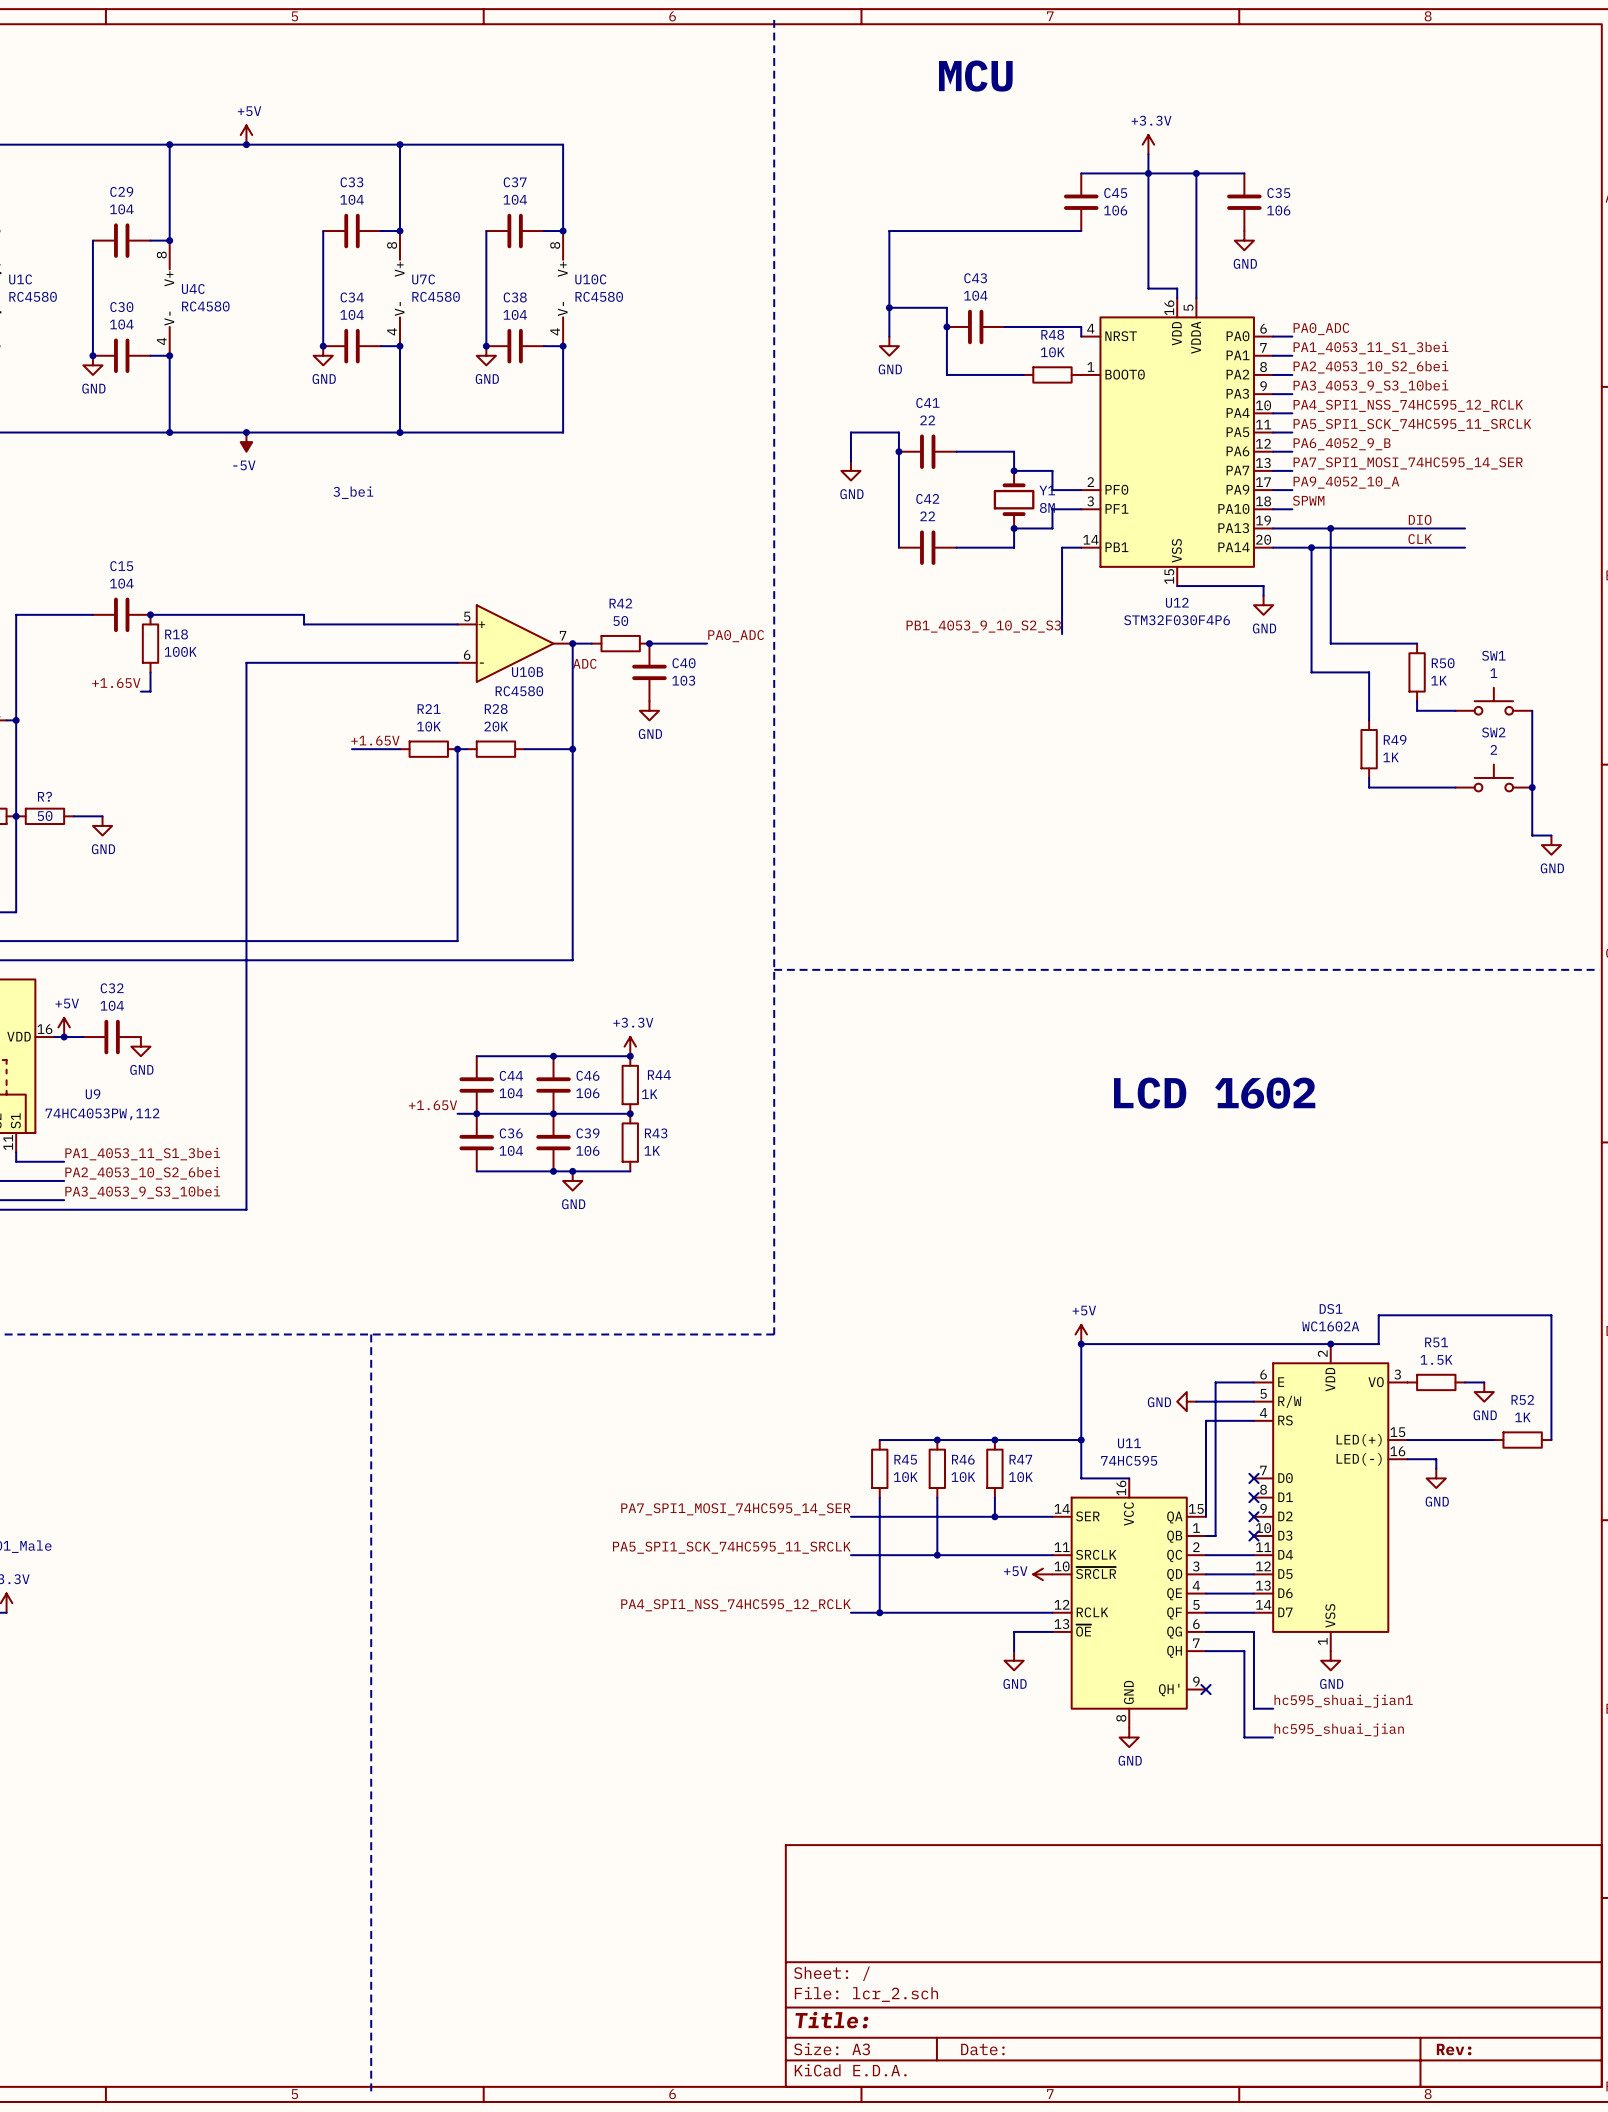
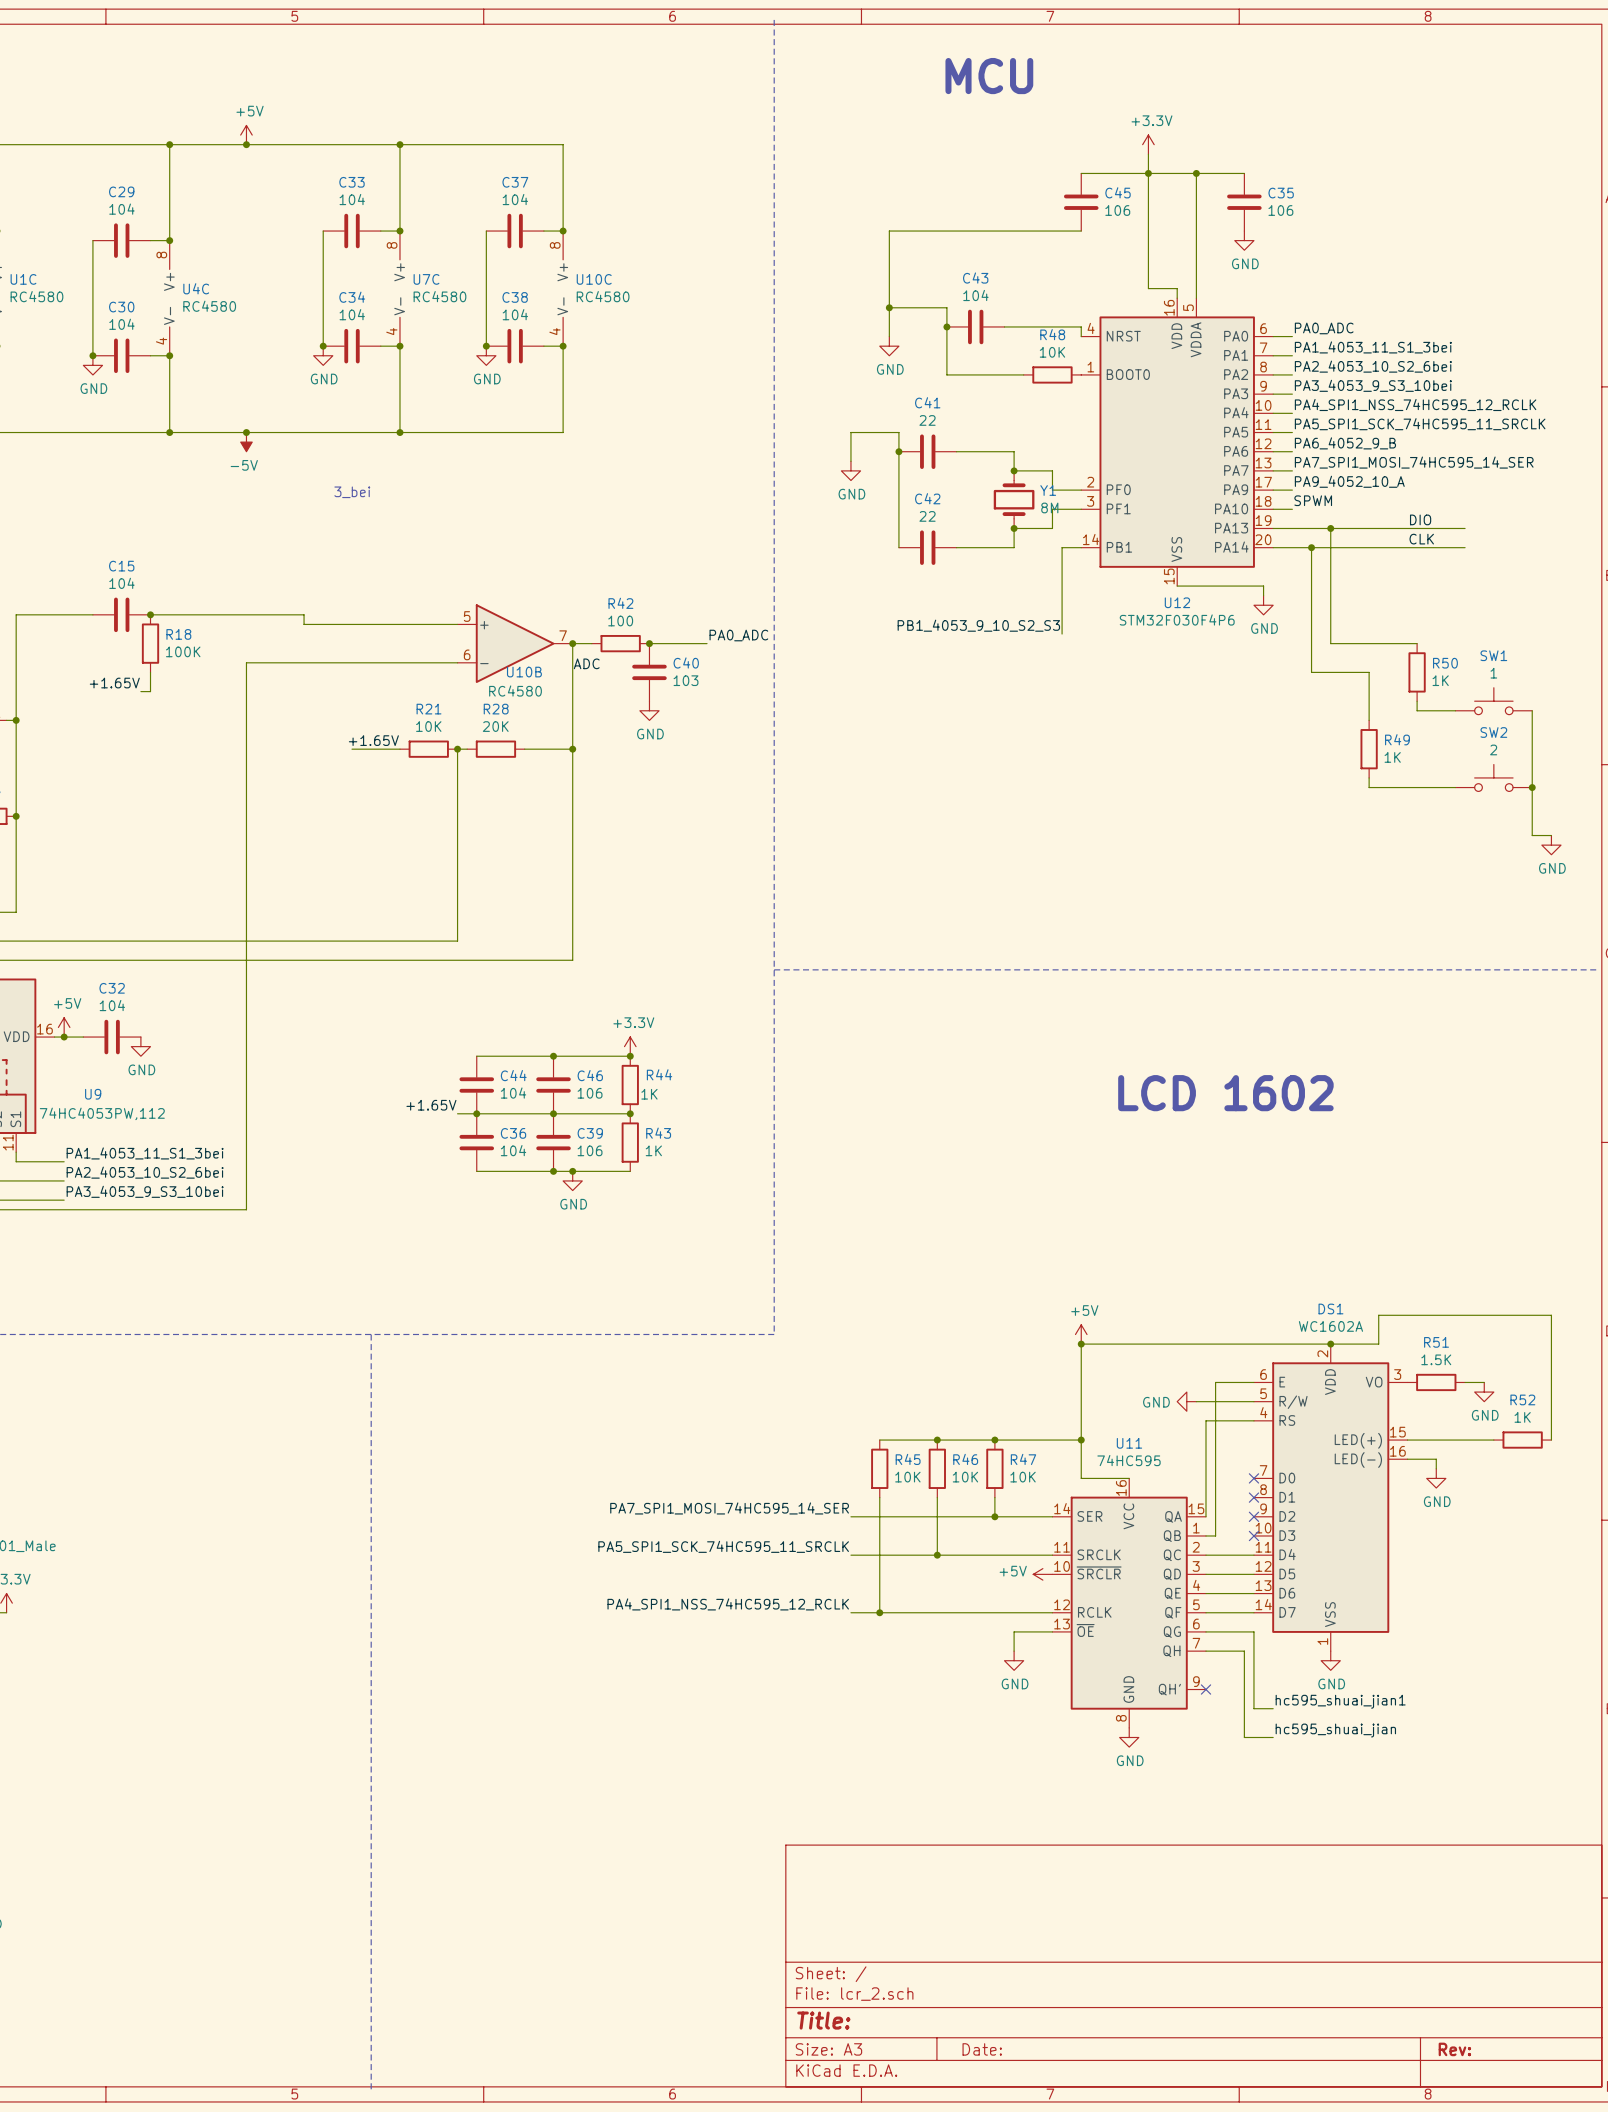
R42 value: 50 (620, 621) -> 100 (620, 621)
R?: 50 (44, 816) -> none
wire: (73, 816) (102, 816) -> none
power symbol: GND (102, 825) -> none

